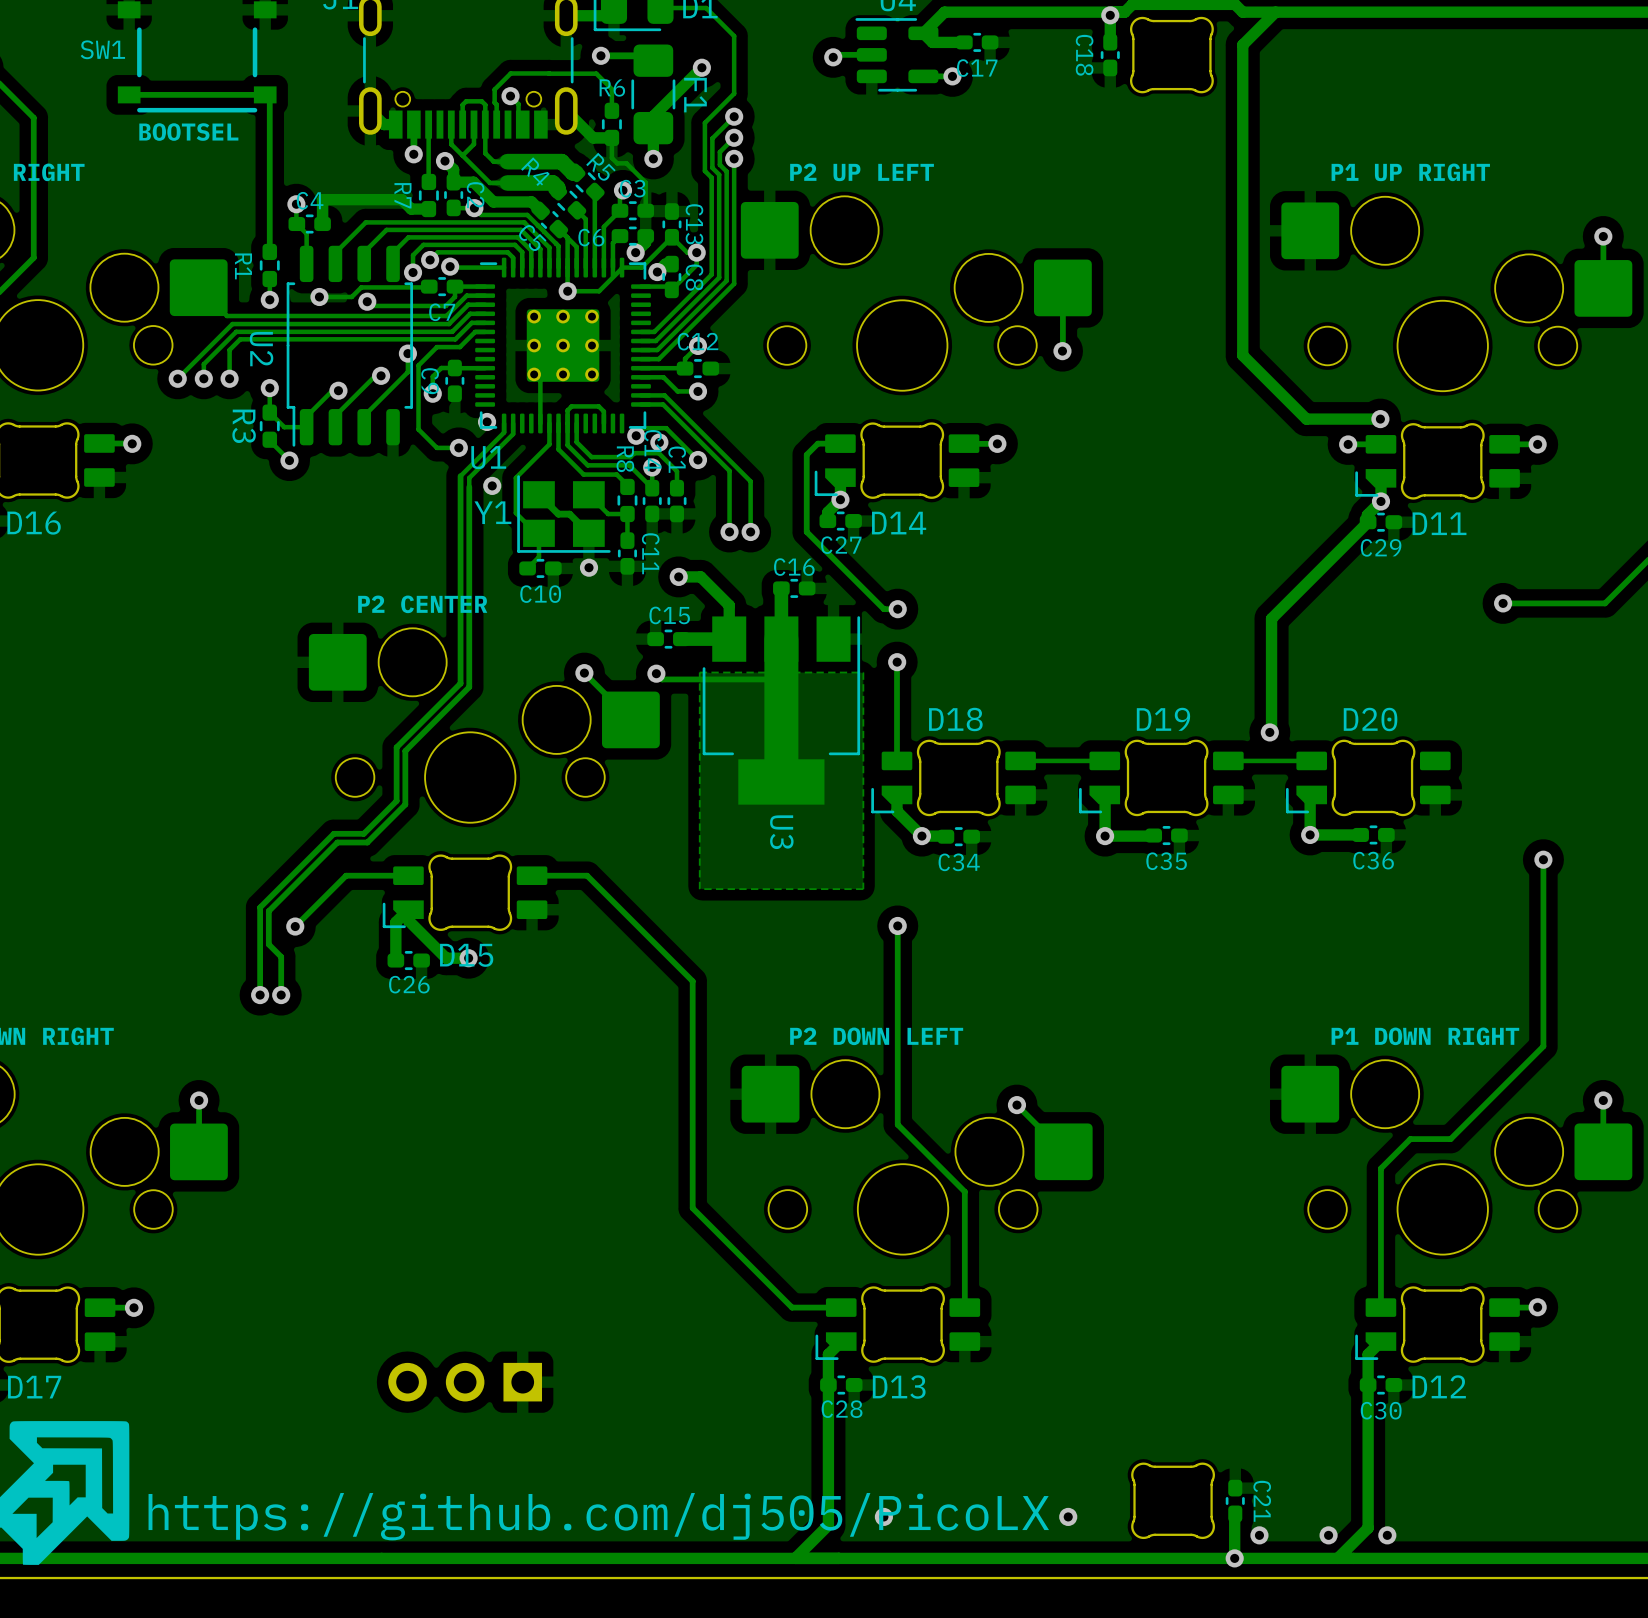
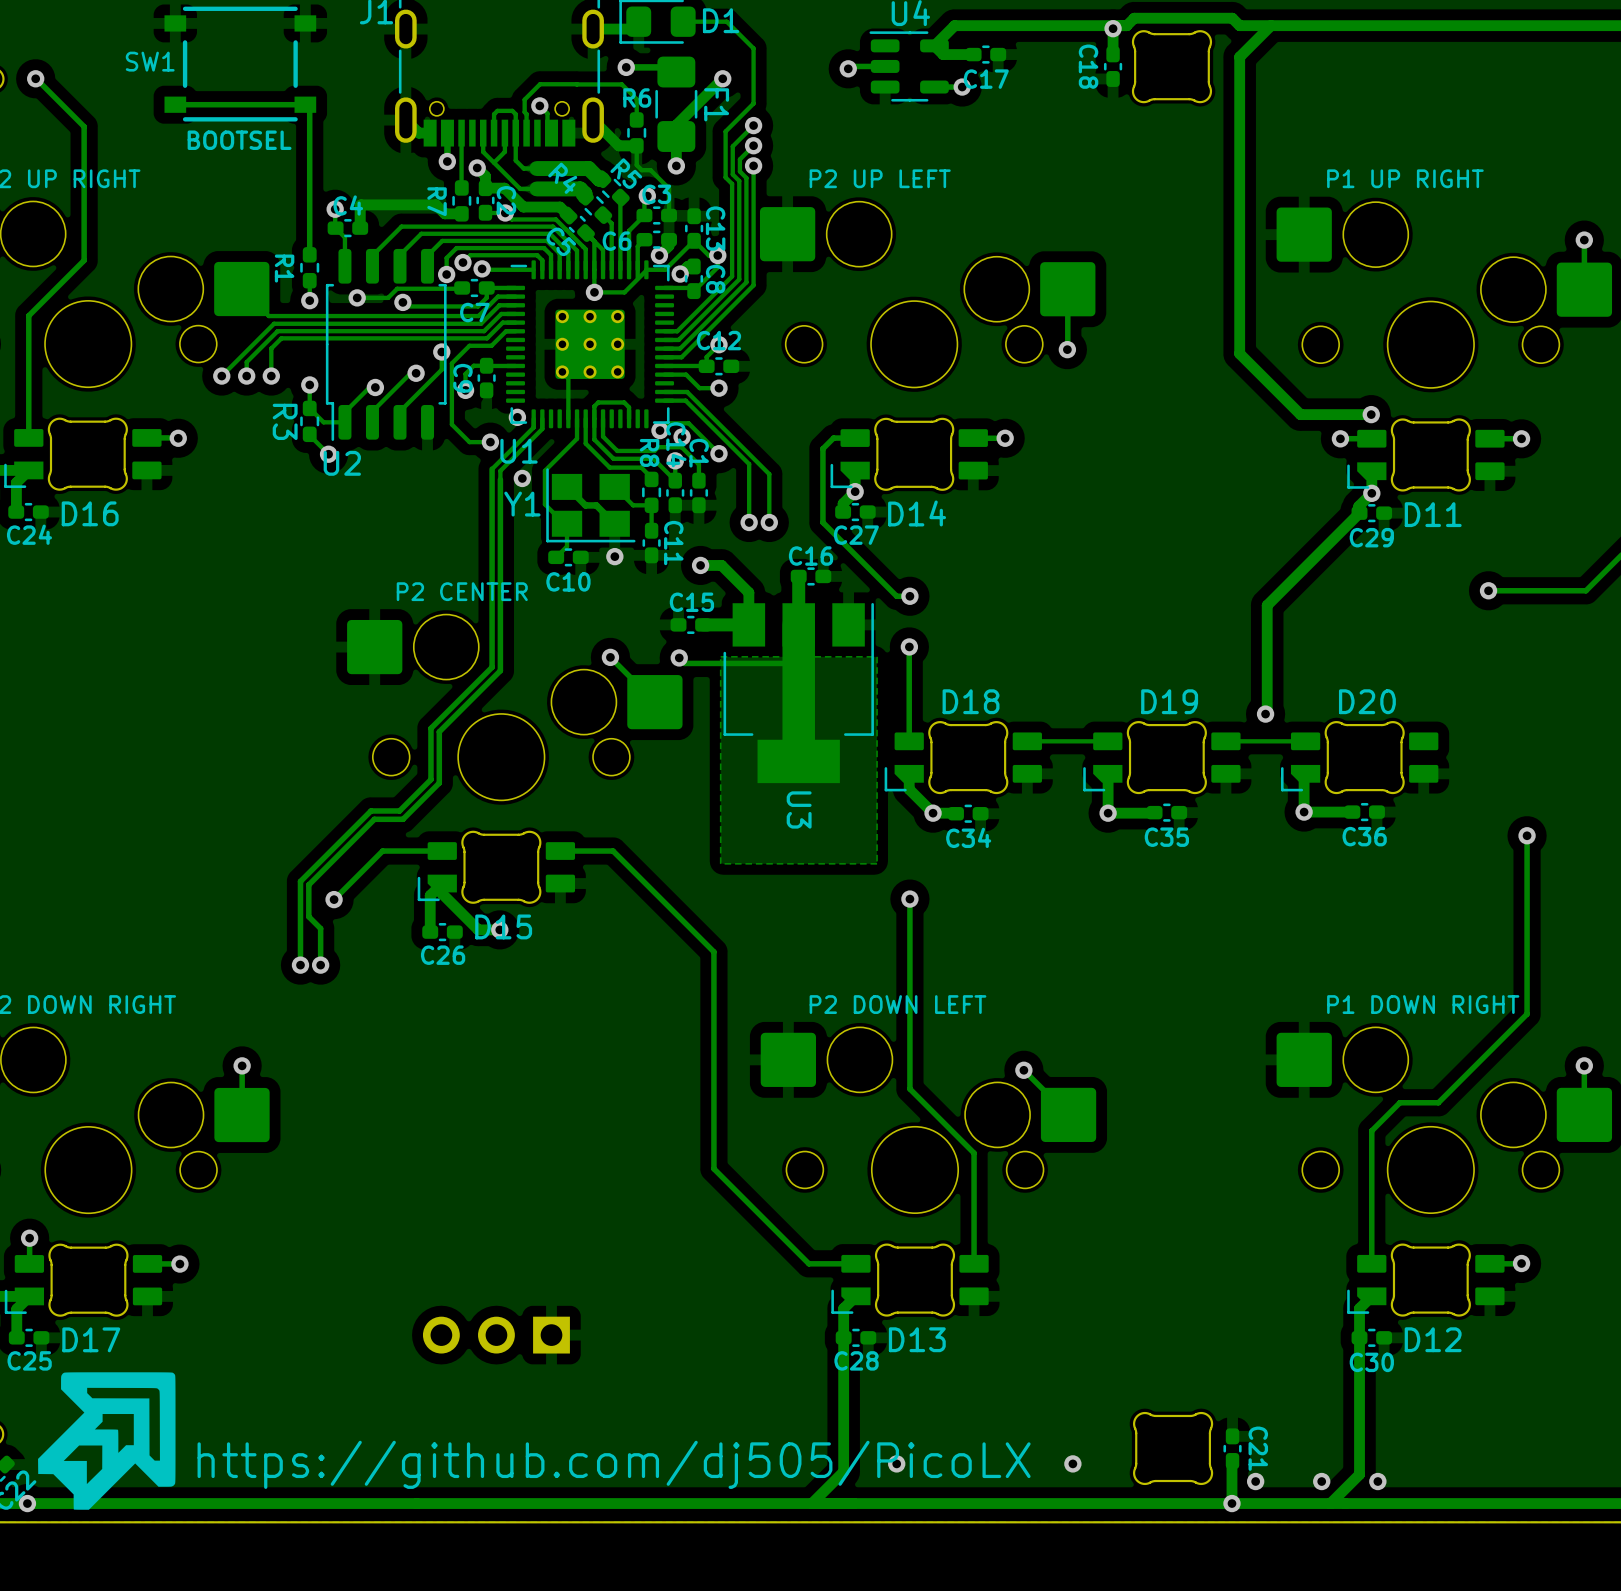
U2 name rotation: 0° (261, 349) -> 90° counterclockwise (342, 463)
U2 name position: U2 (261, 349) -> U2 (342, 463)

